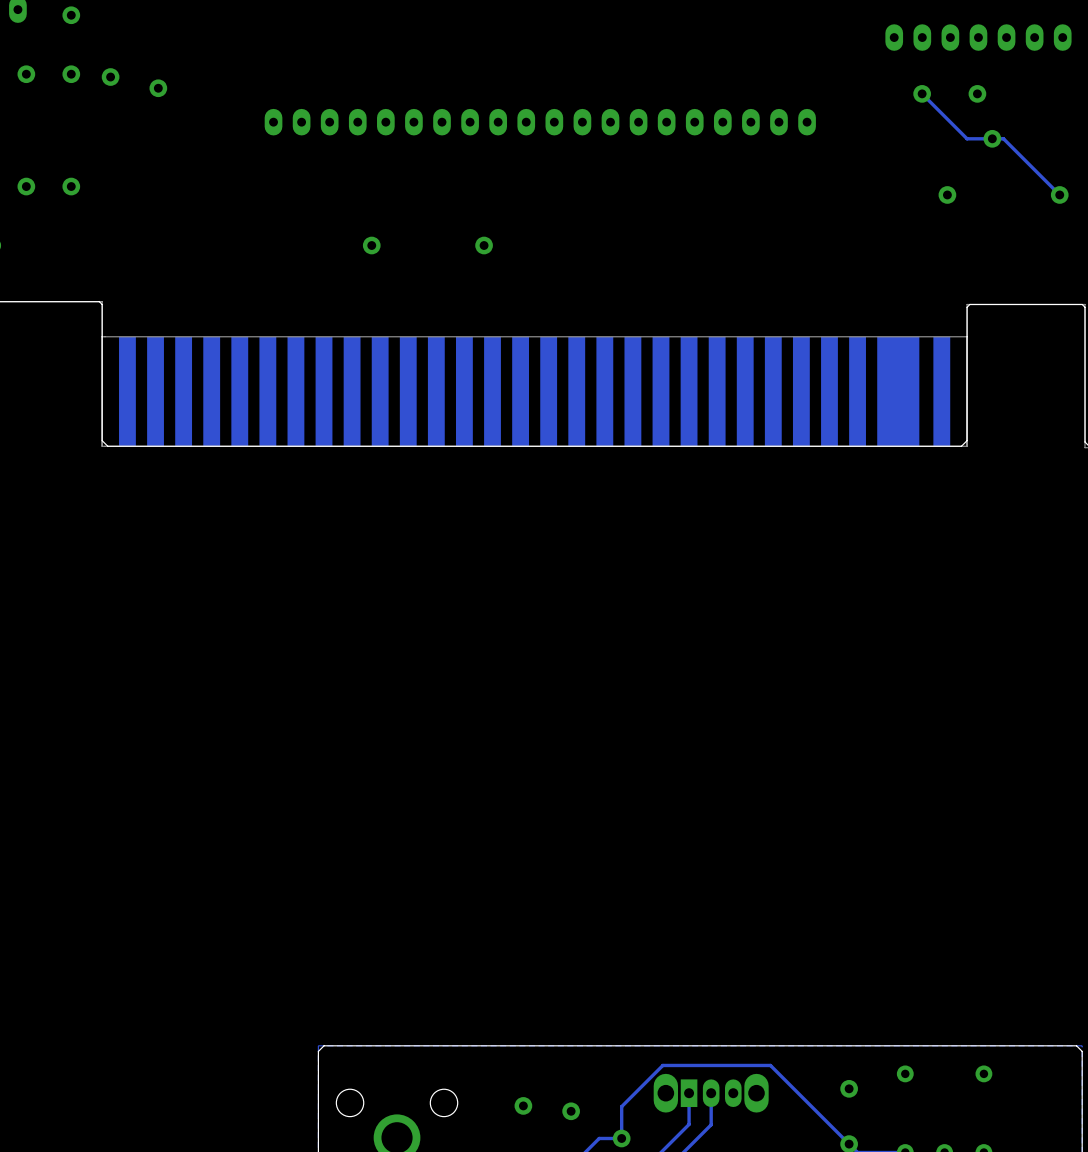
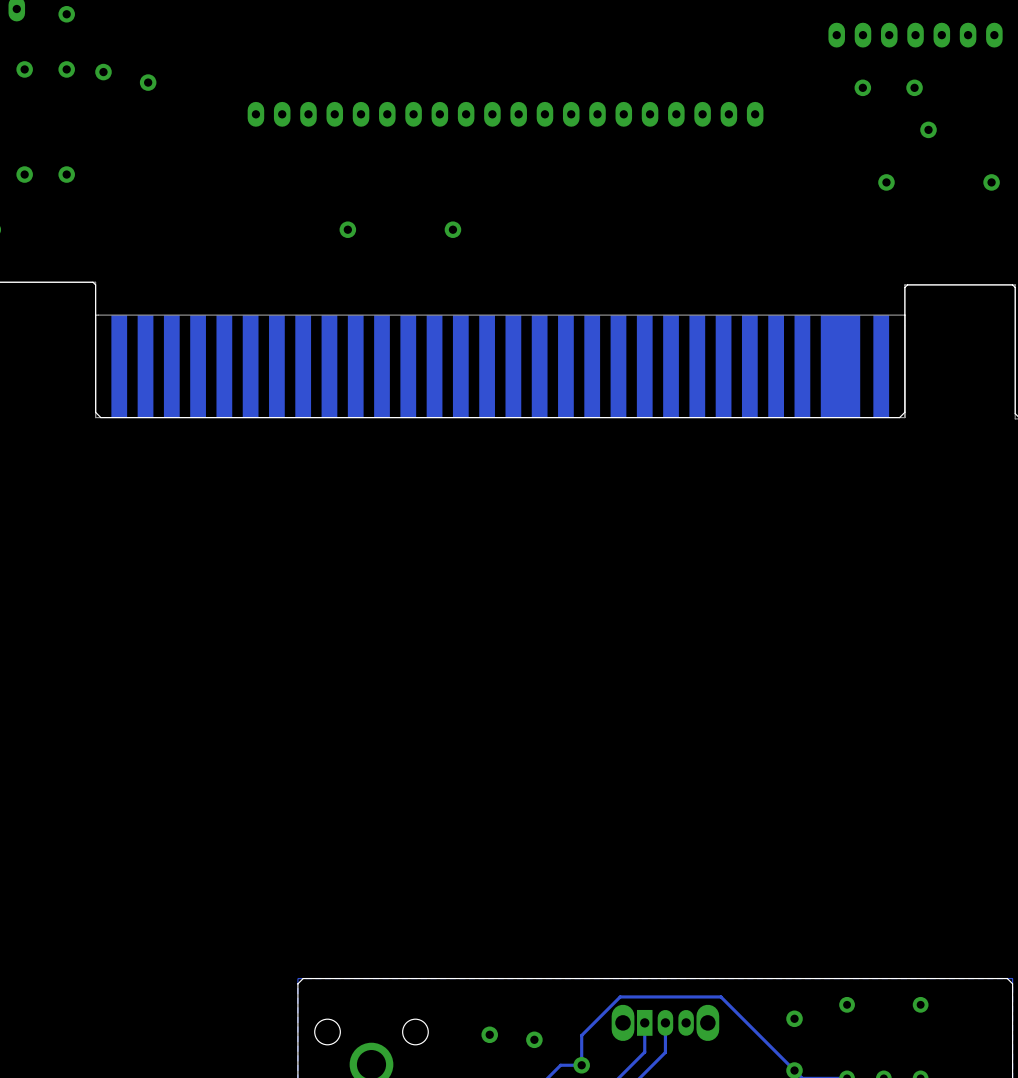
track: (922, 93) (967, 138) (1003, 138) (1059, 194) -> none

